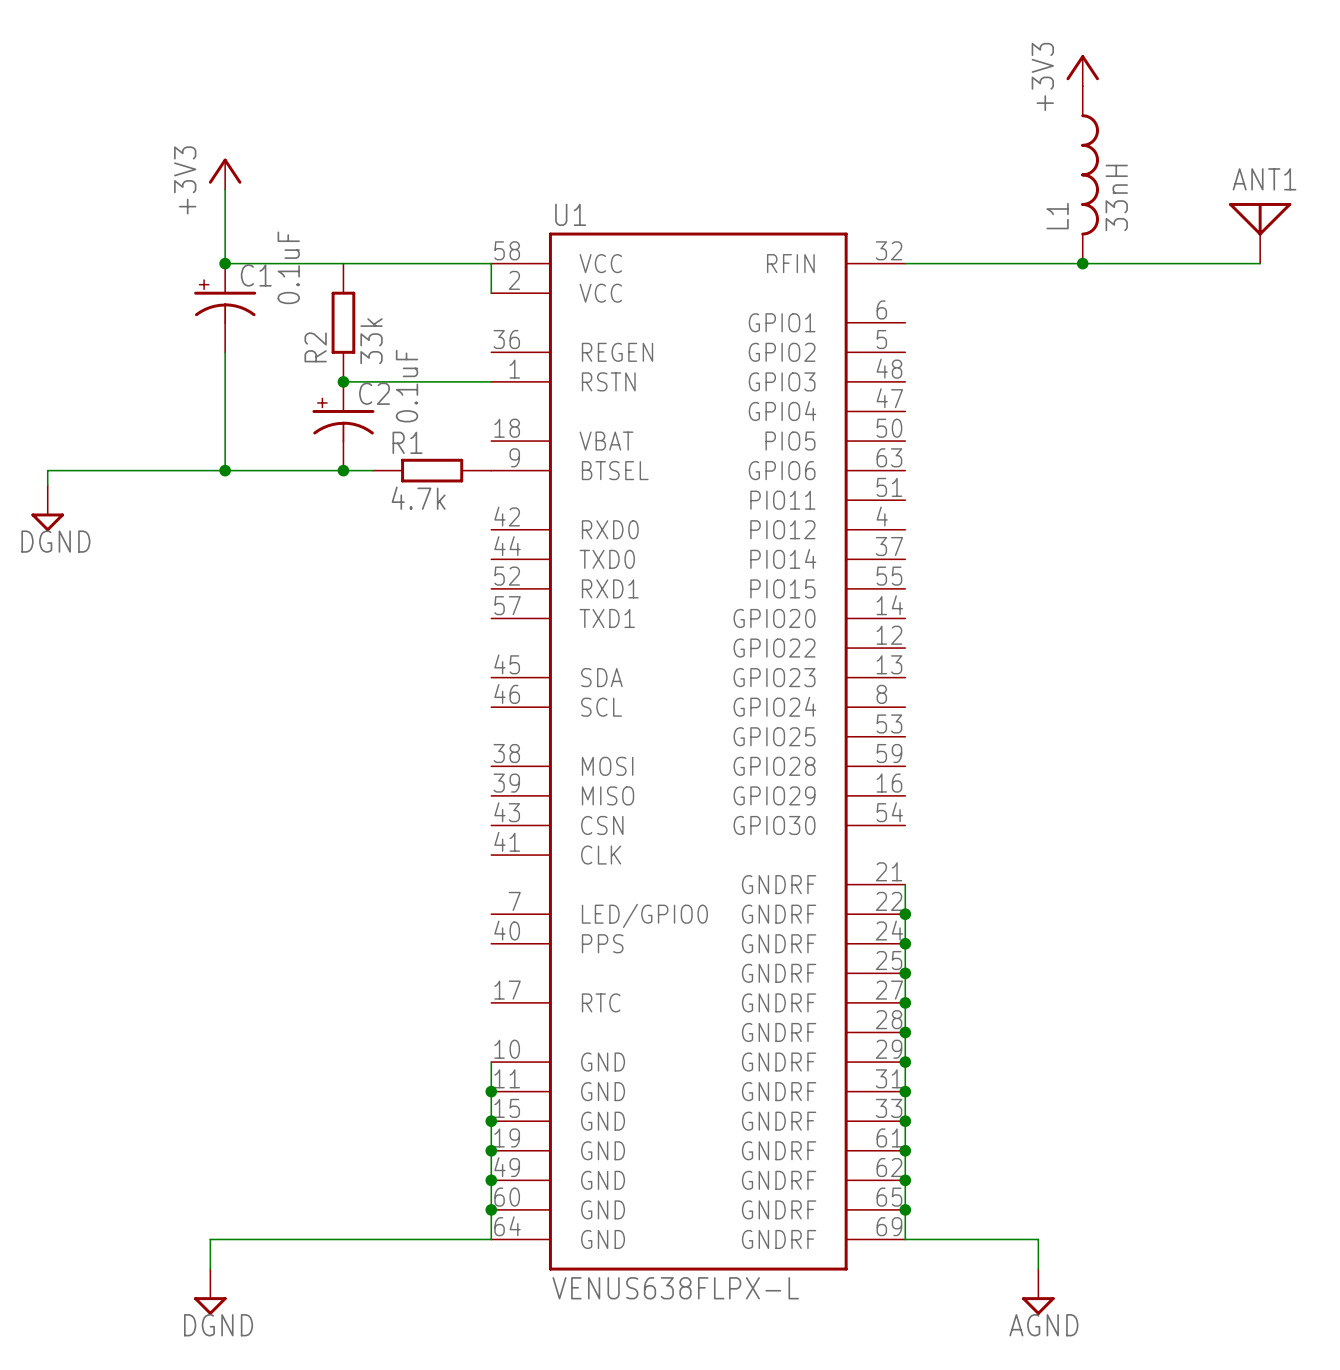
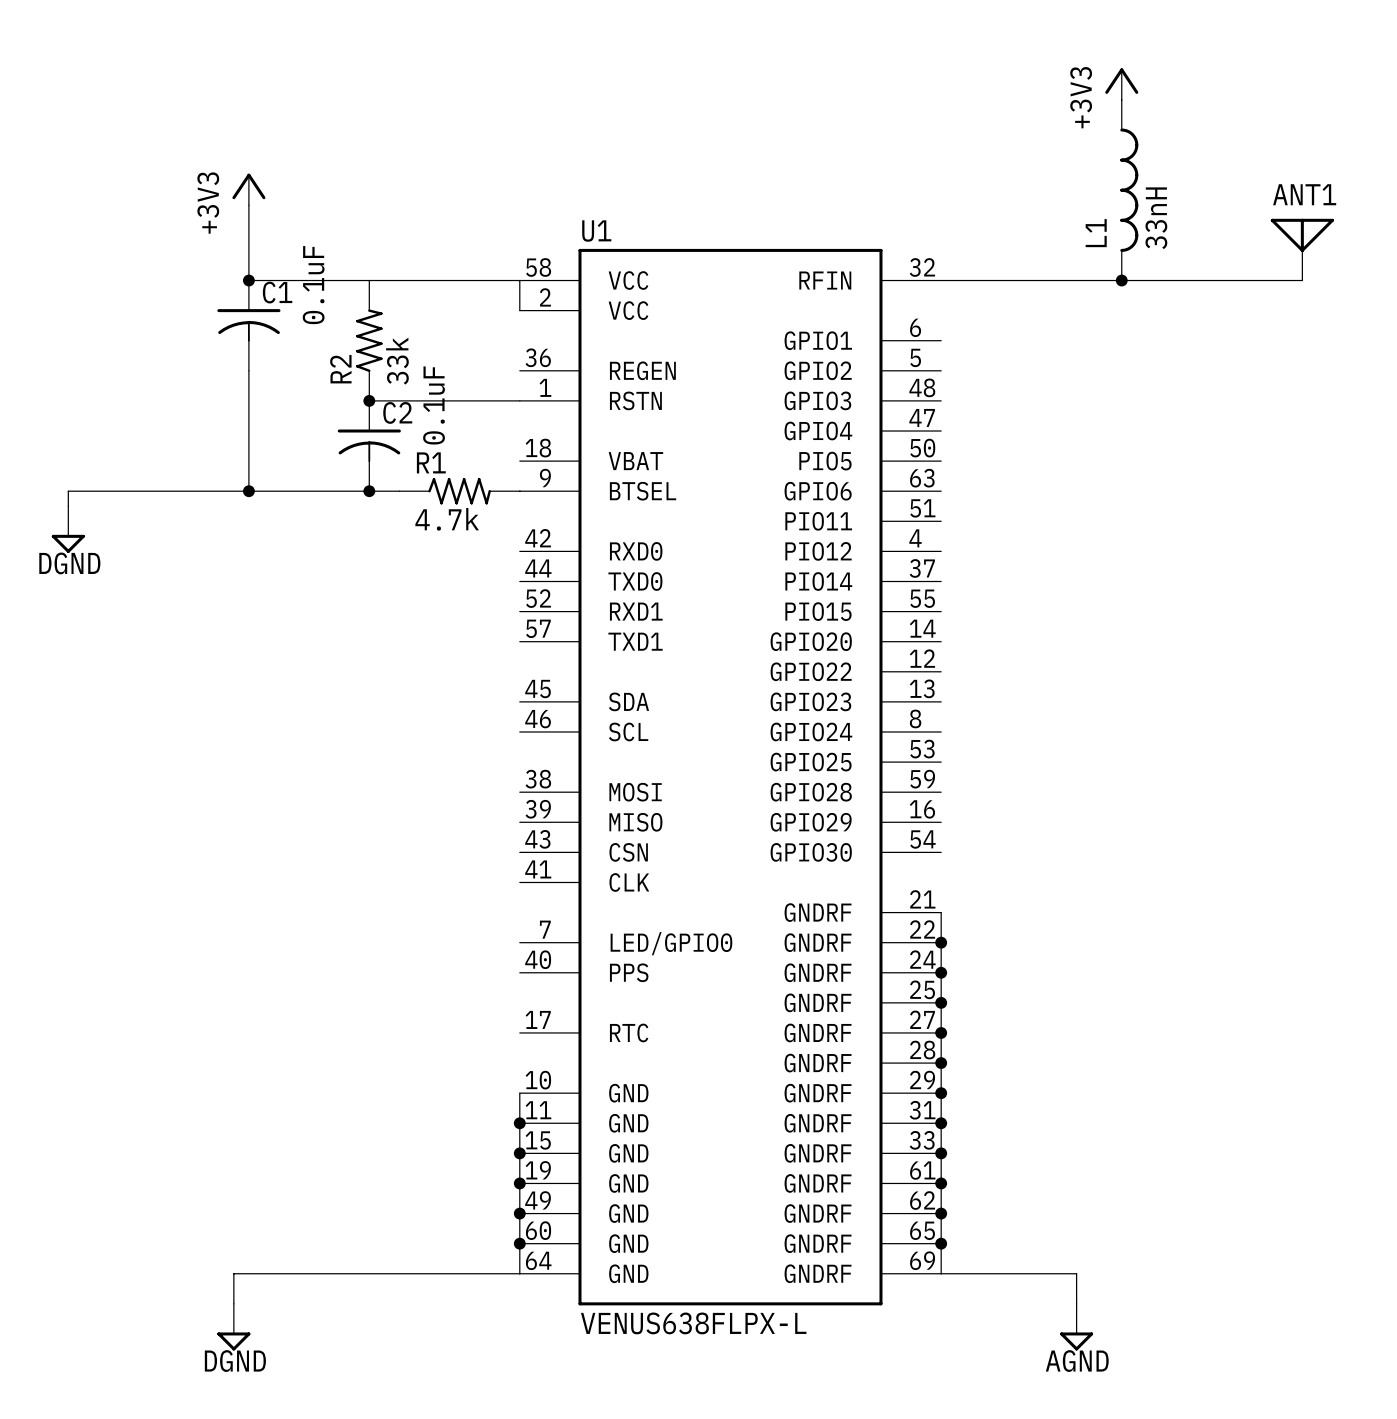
C1 symbol: [194, 263, 257, 353] -> [217, 280, 281, 371]
R2 symbol: [331, 263, 356, 382] -> [356, 280, 383, 401]
C2 symbol: [312, 381, 375, 471] -> [337, 400, 401, 492]
R1 symbol: [373, 458, 492, 483] -> [399, 477, 520, 505]

